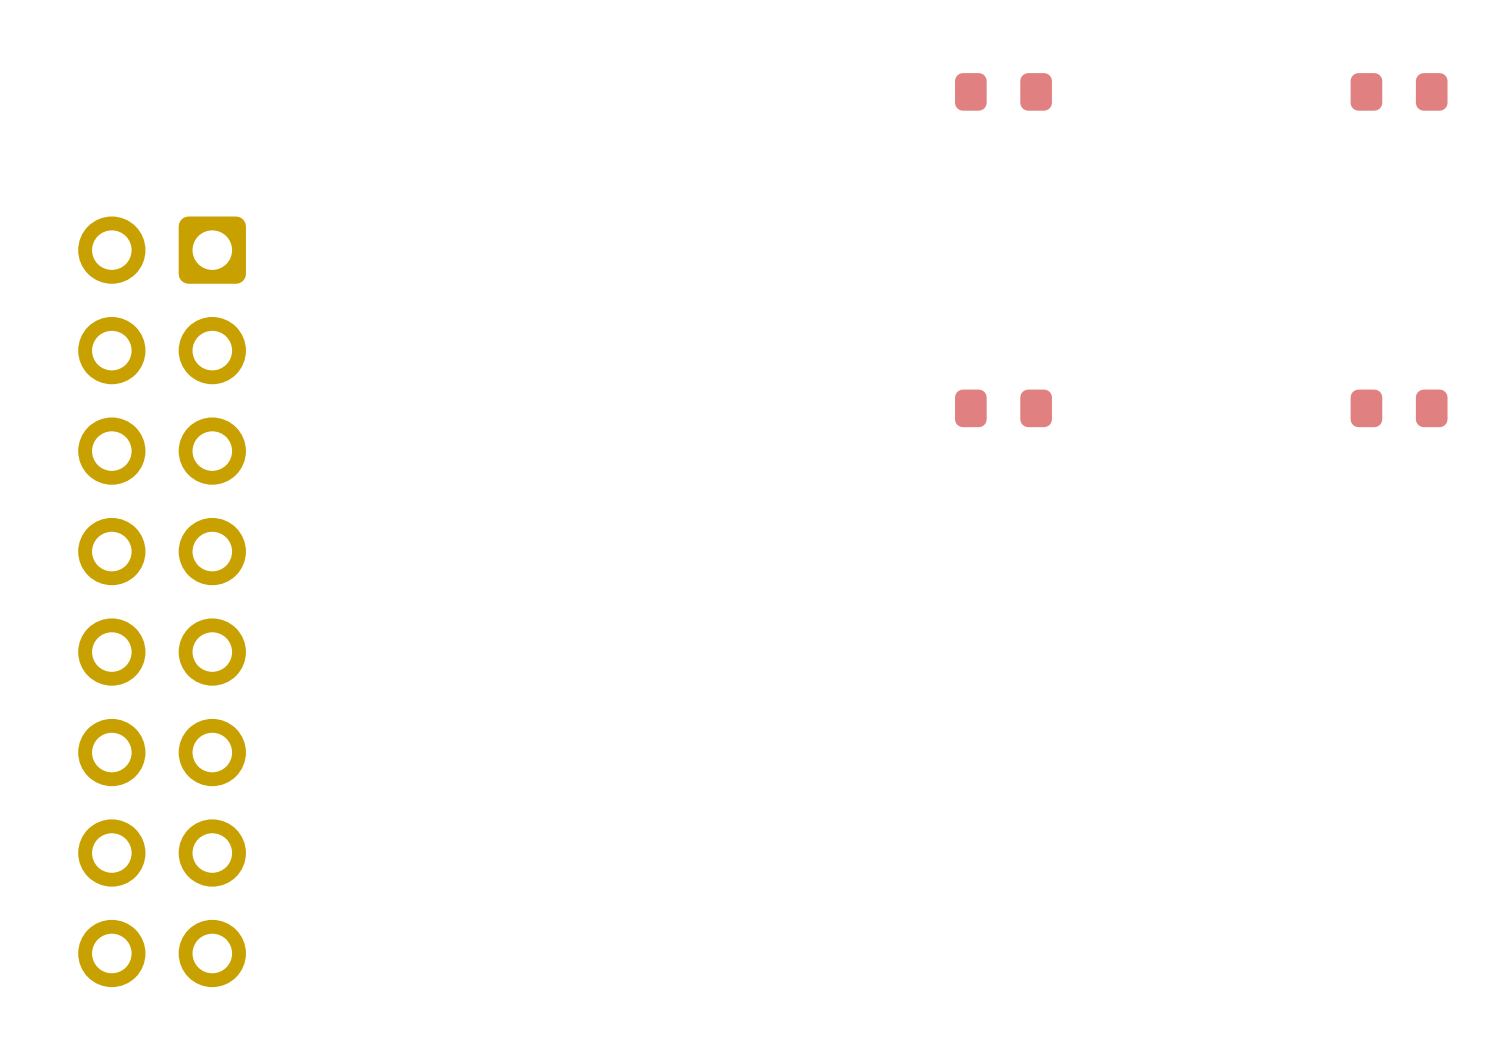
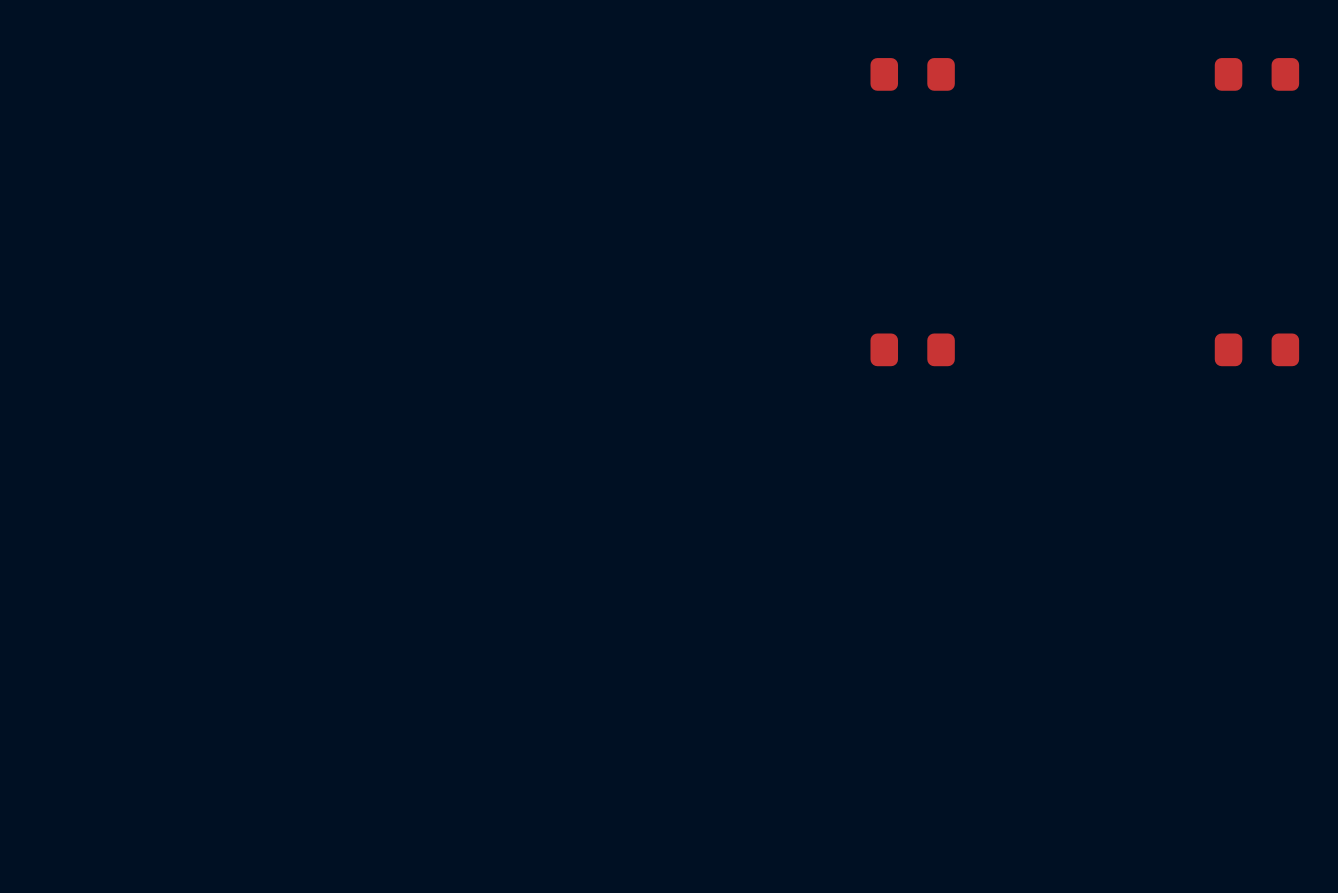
part: (162, 601) -> none

